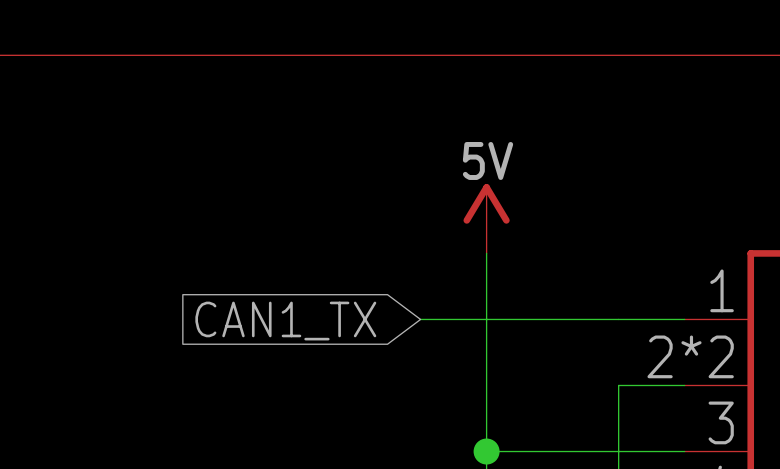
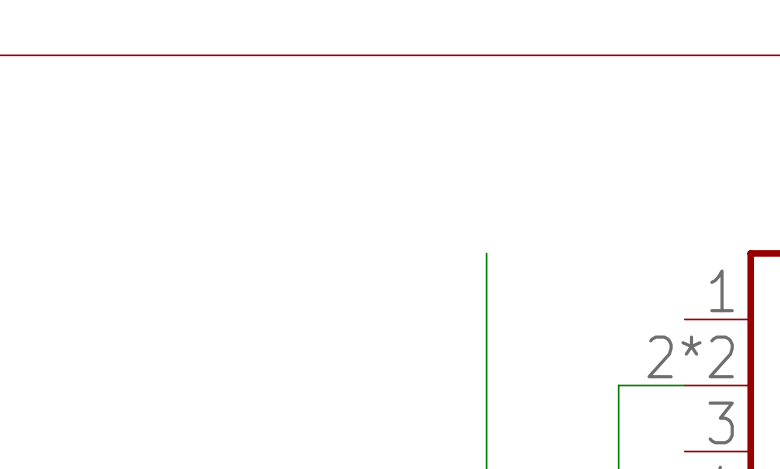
power symbol: 5V (486, 218) -> none
wire: (420, 319) (684, 319) -> none
global label: CAN1_TX (285, 321) -> none
wire: (486, 451) (684, 451) -> none
junction: (486, 451) -> none

